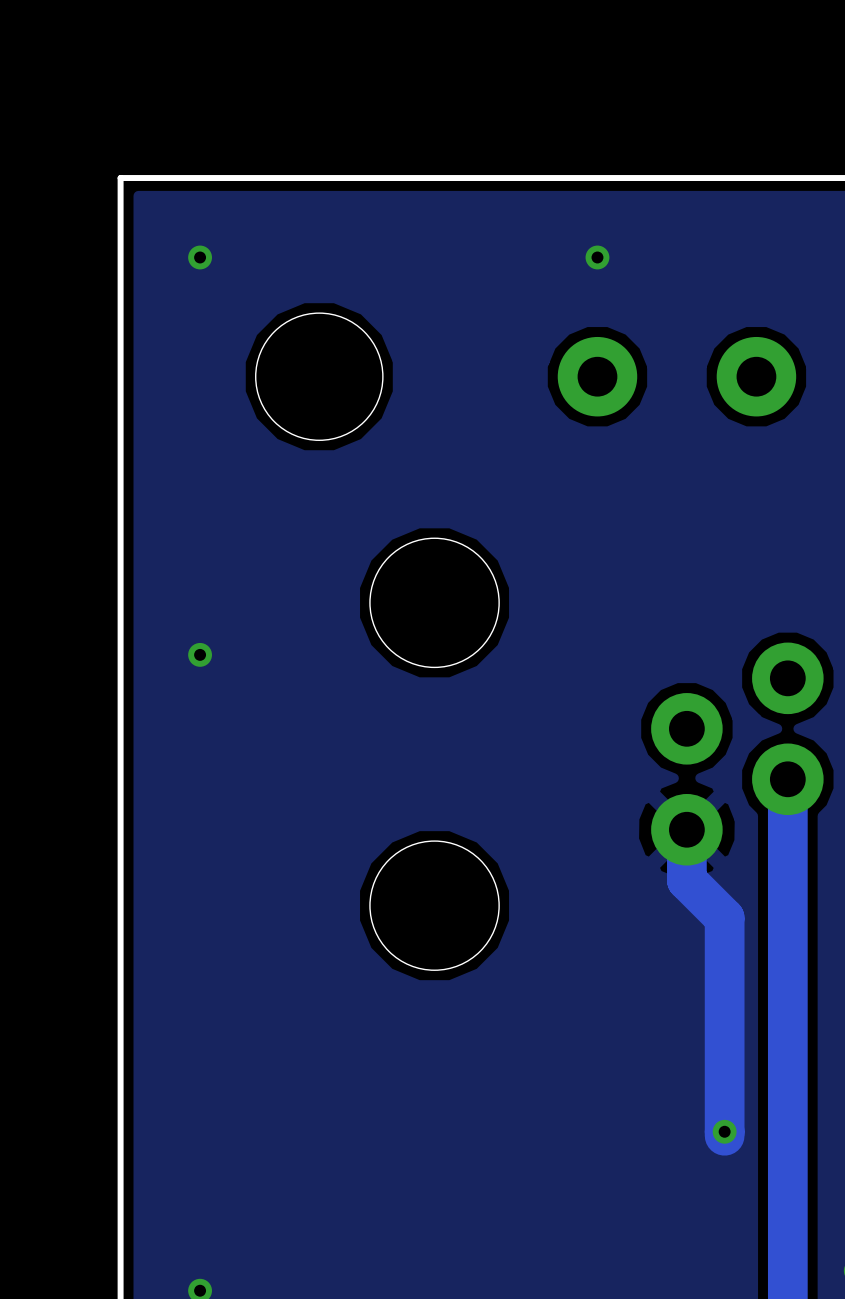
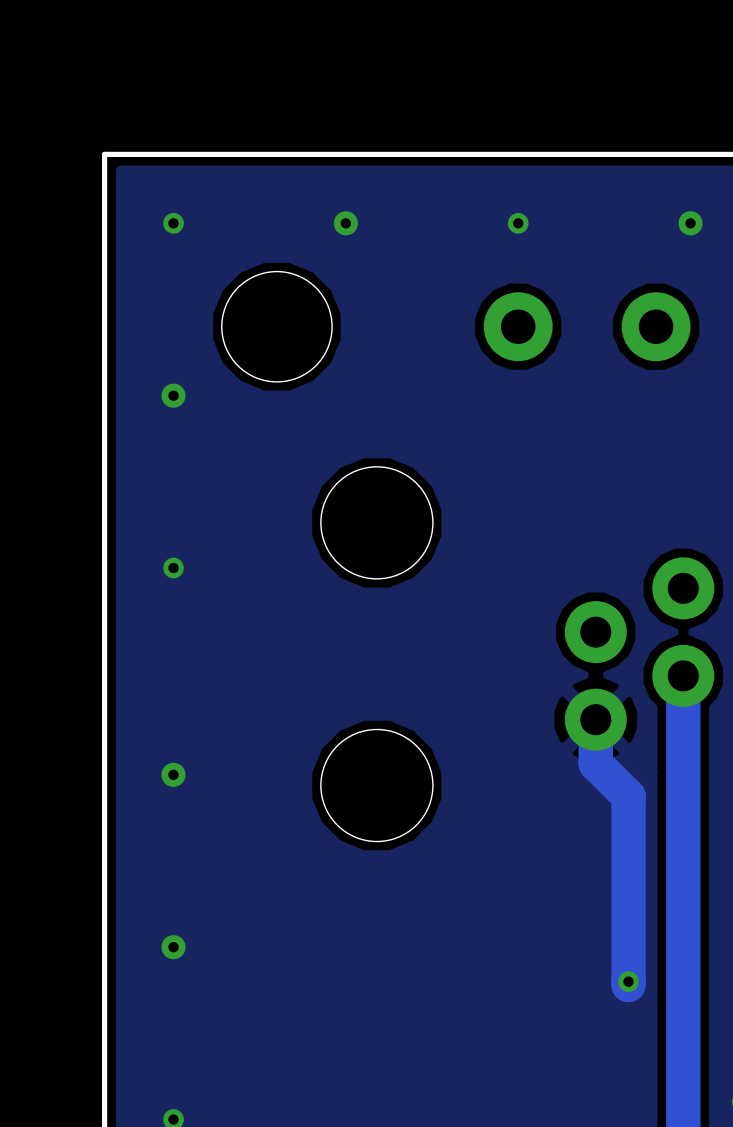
via: none -> (345, 223)
via: none -> (690, 223)
via: none -> (173, 395)
via: none -> (173, 774)
via: none -> (173, 947)

